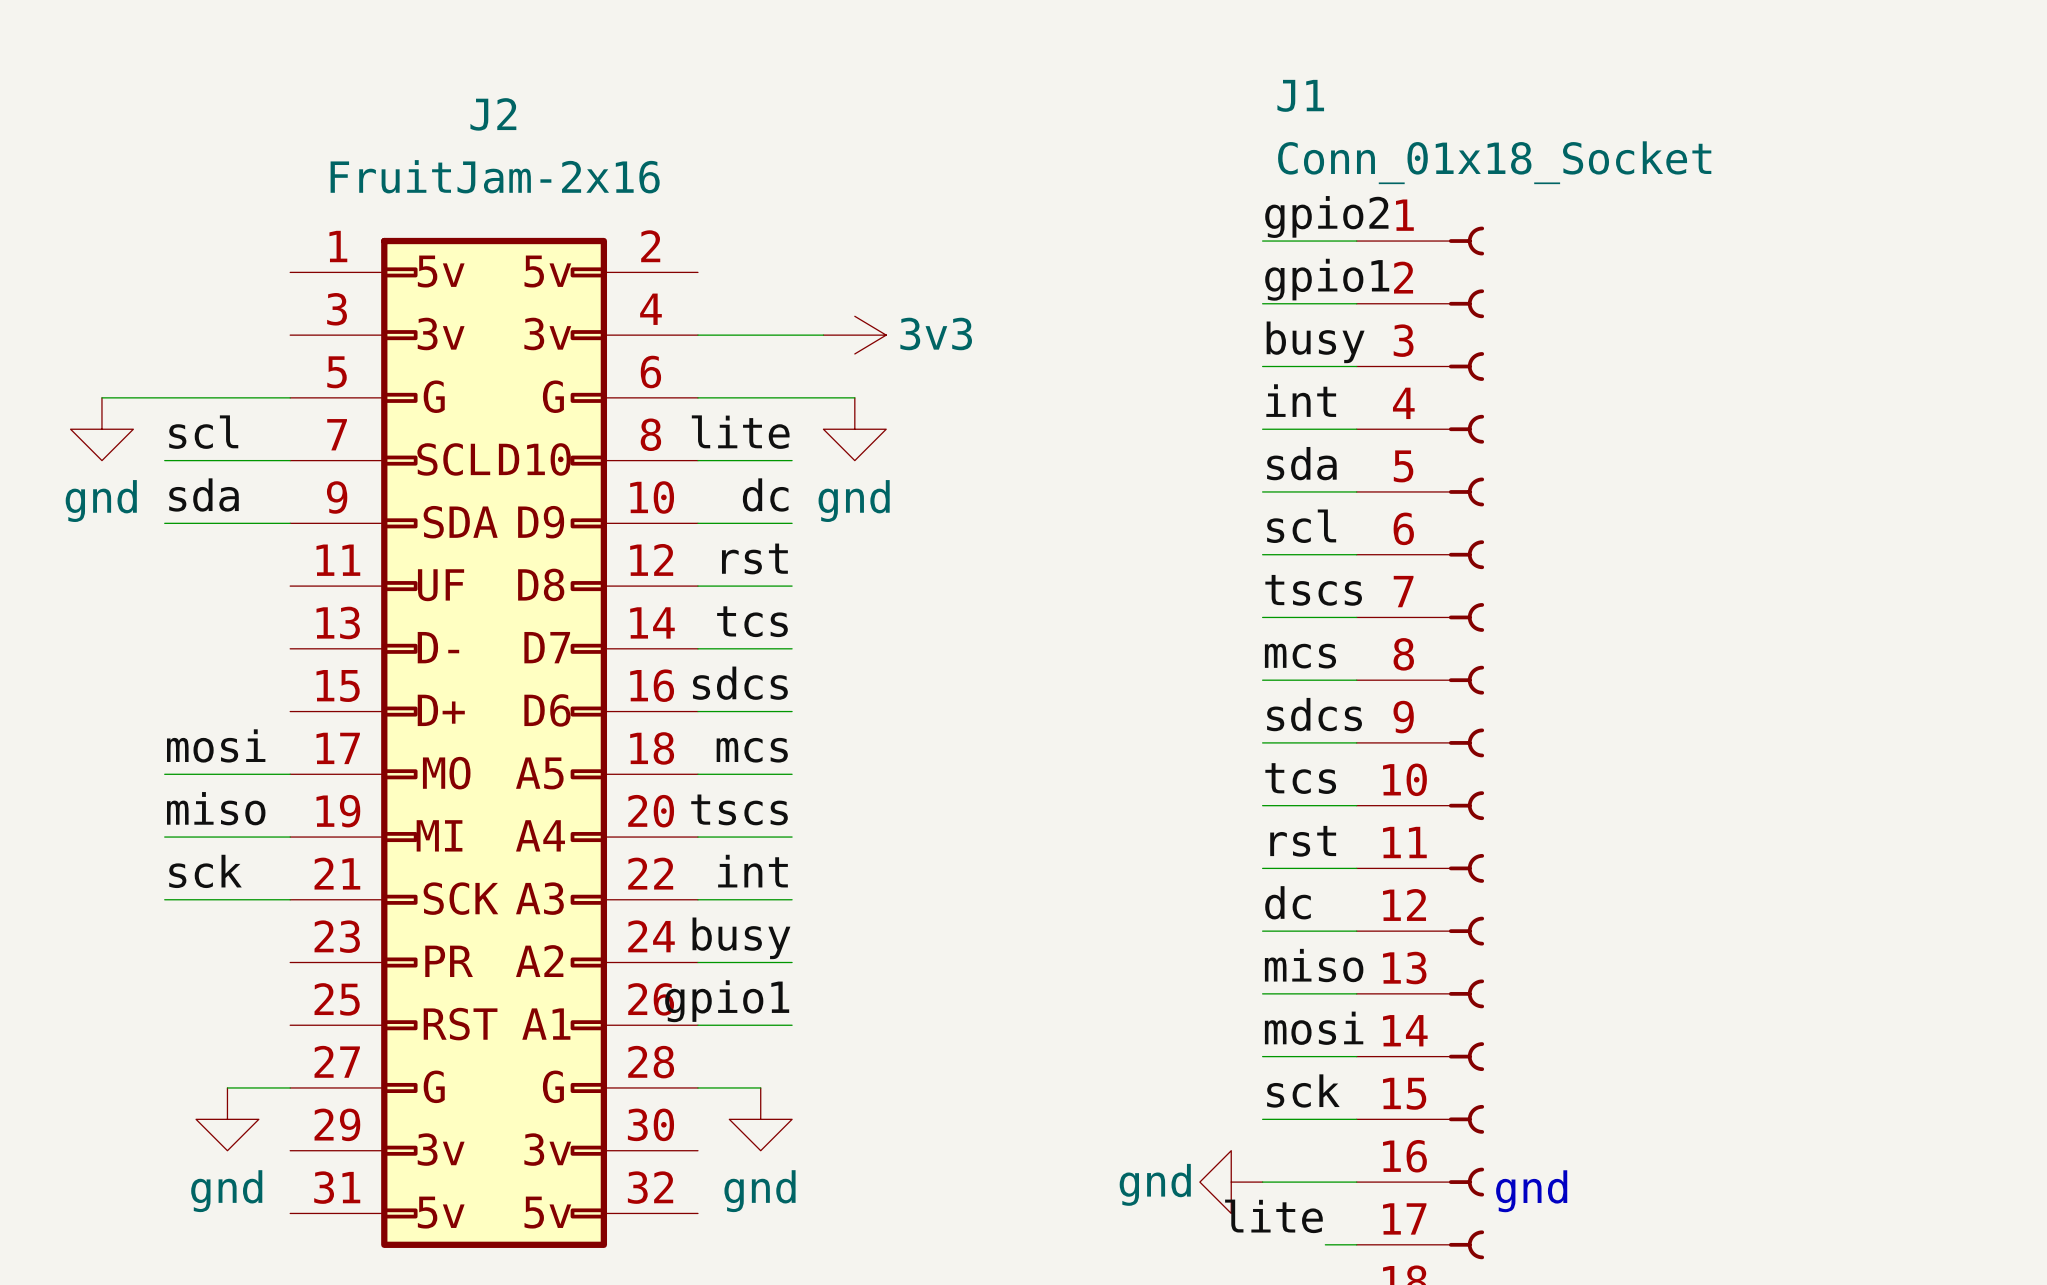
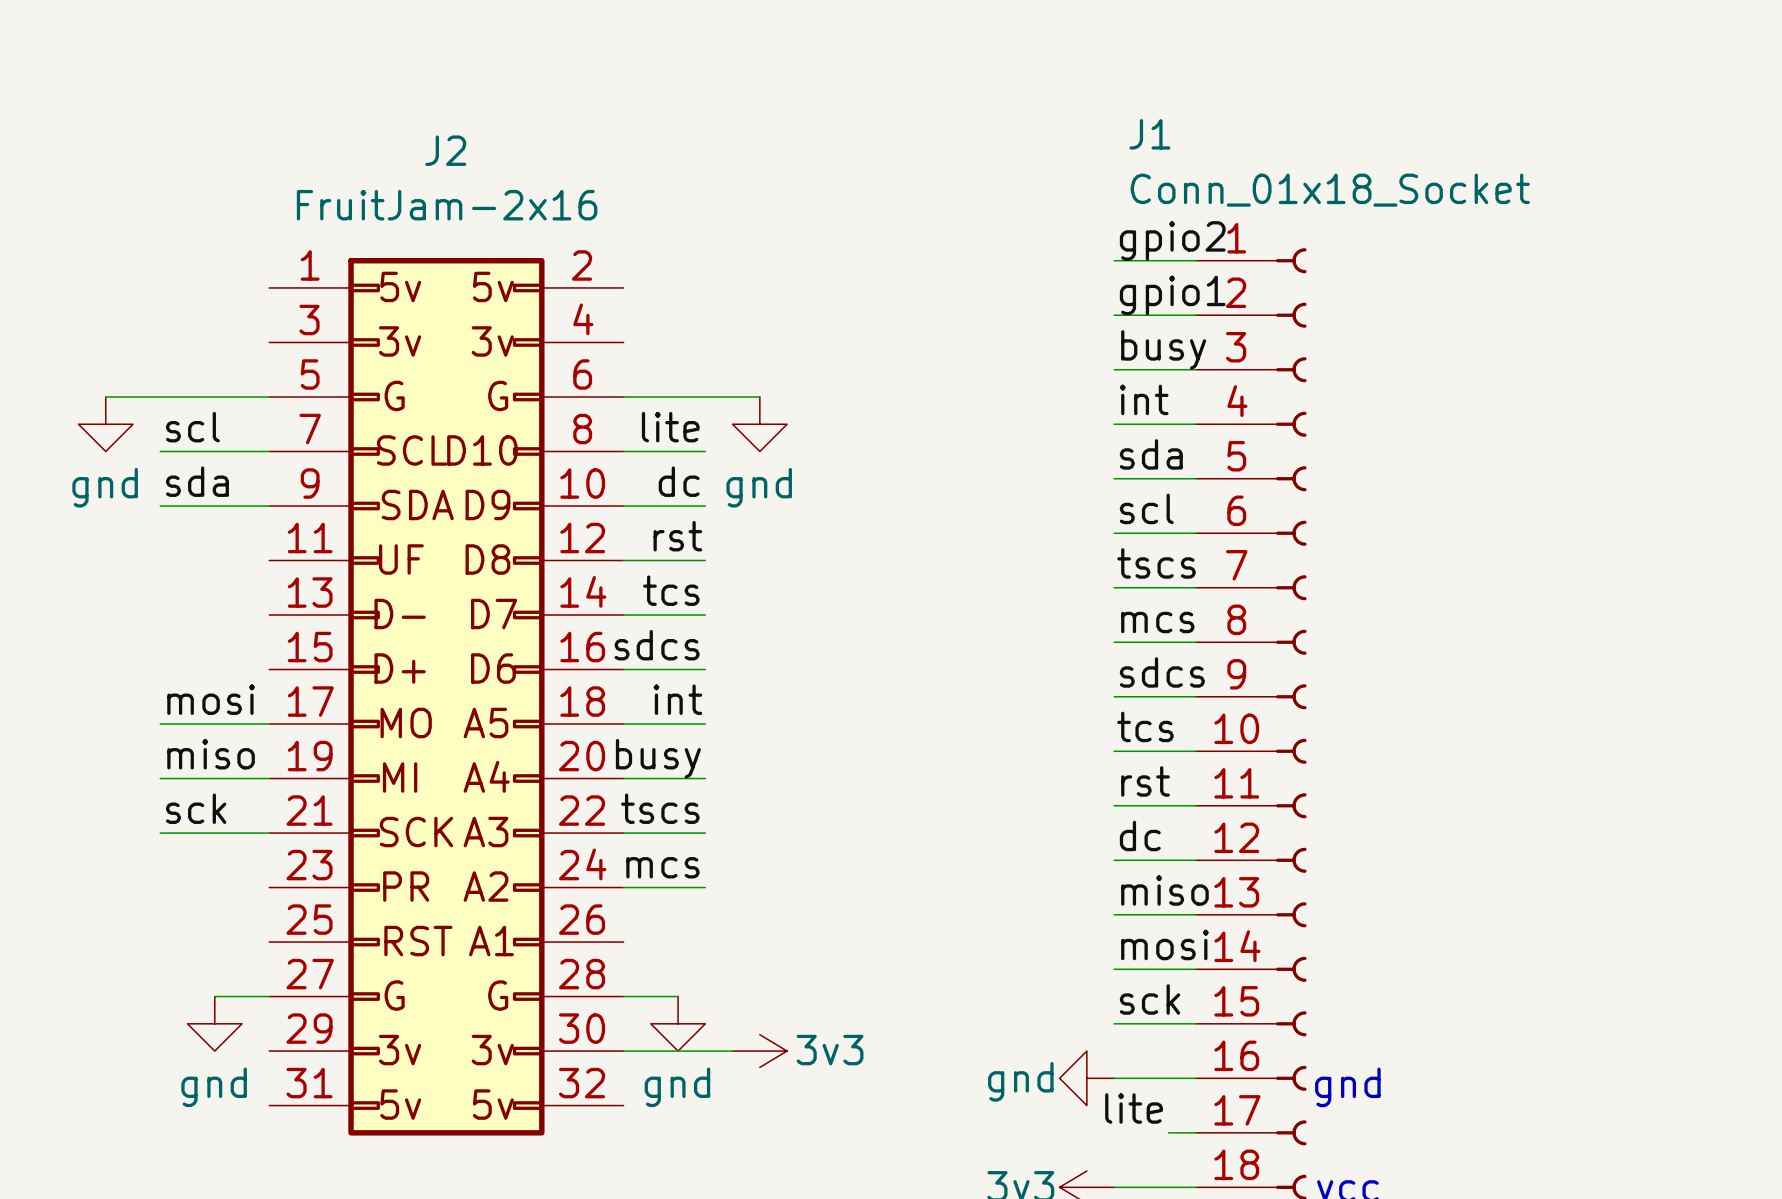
wire: (697, 335) (823, 335) -> none
power symbol: 3v3 (854, 335) -> none
label: mcs (752, 750) -> int (677, 699)
label: tscs (739, 809) -> busy (658, 758)
label: int (752, 871) -> tscs (660, 808)
label: busy (741, 938) -> mcs (662, 867)
label: gpio1 (727, 1001) -> none
wire: (697, 1025) (792, 1025) -> none
wire: none -> (623, 1051) (732, 1051)
power symbol: none -> 3v3 (759, 1051)

